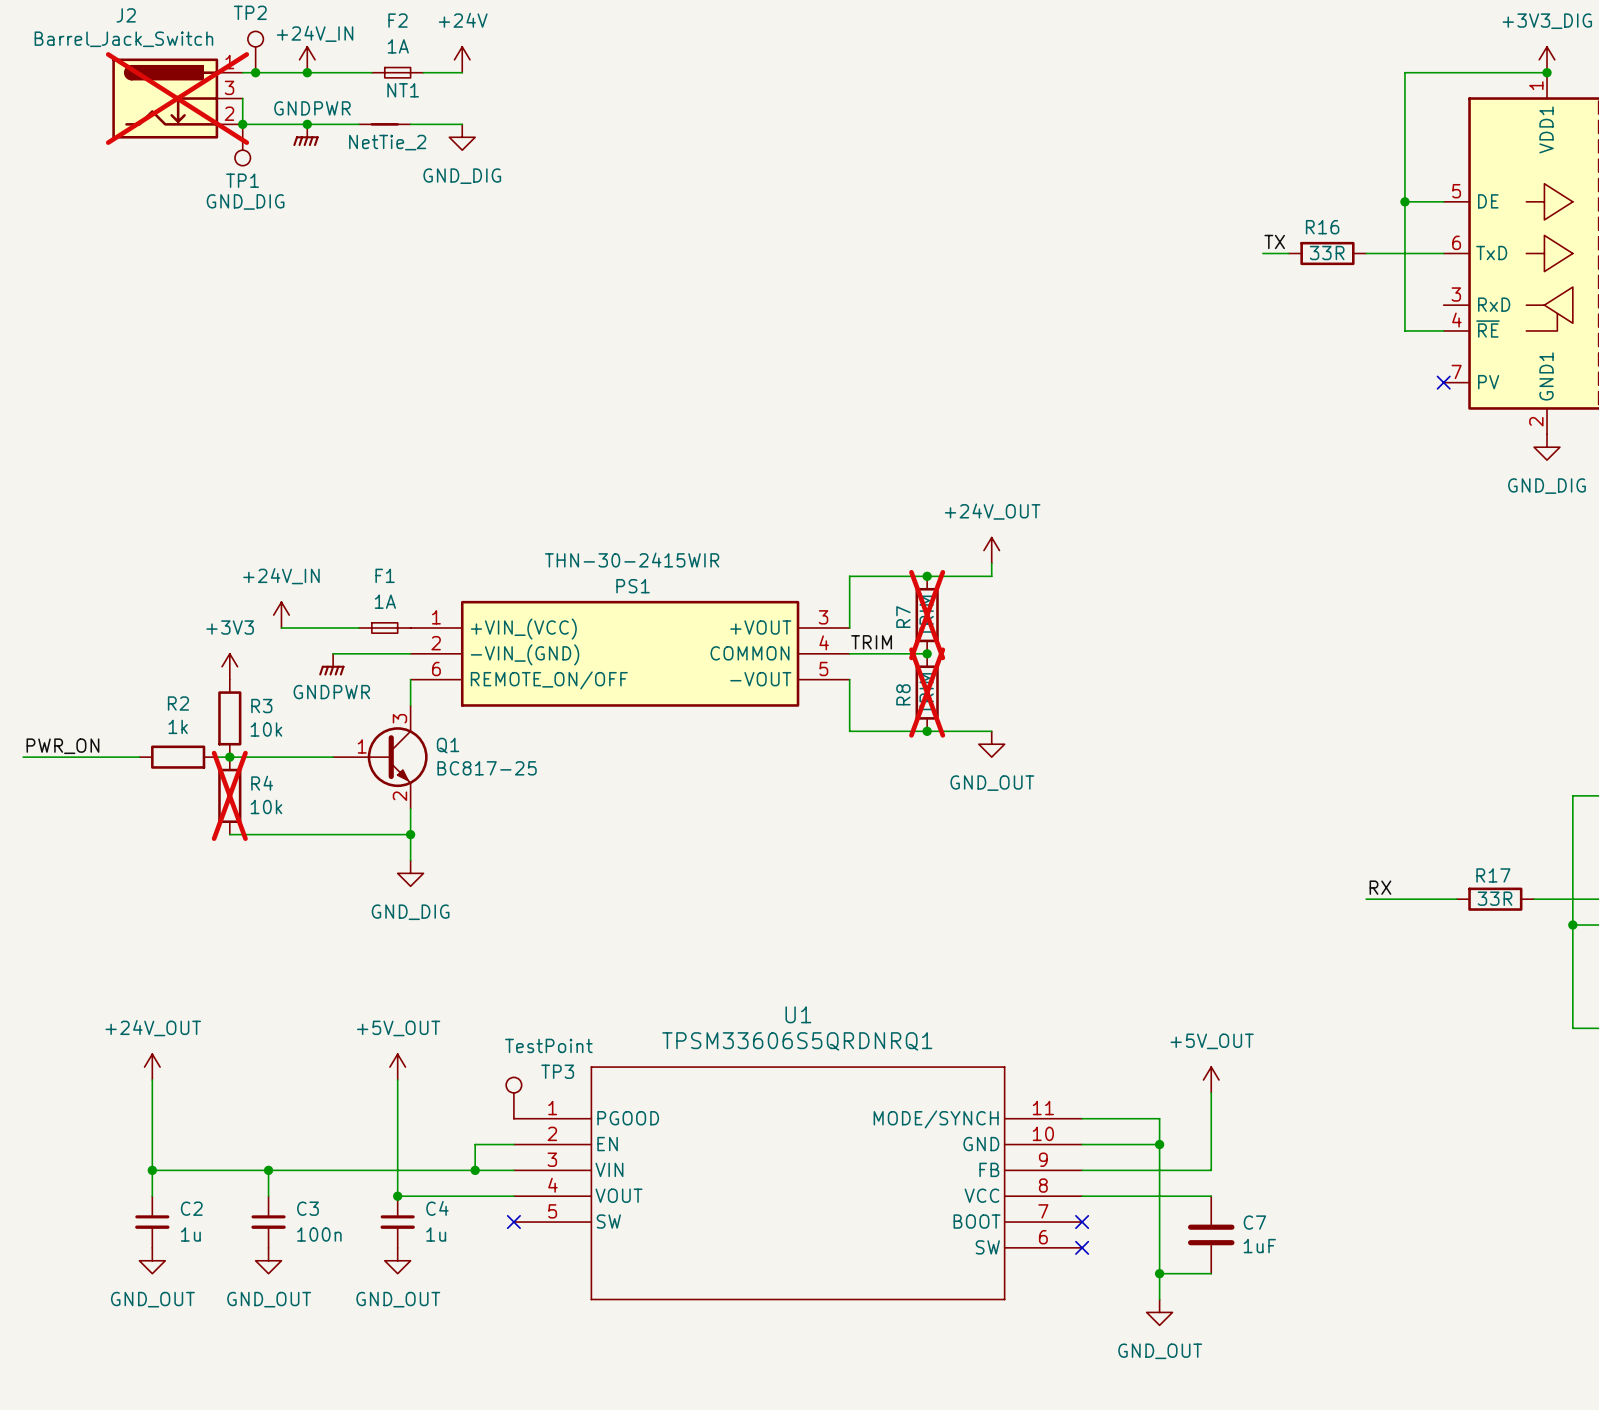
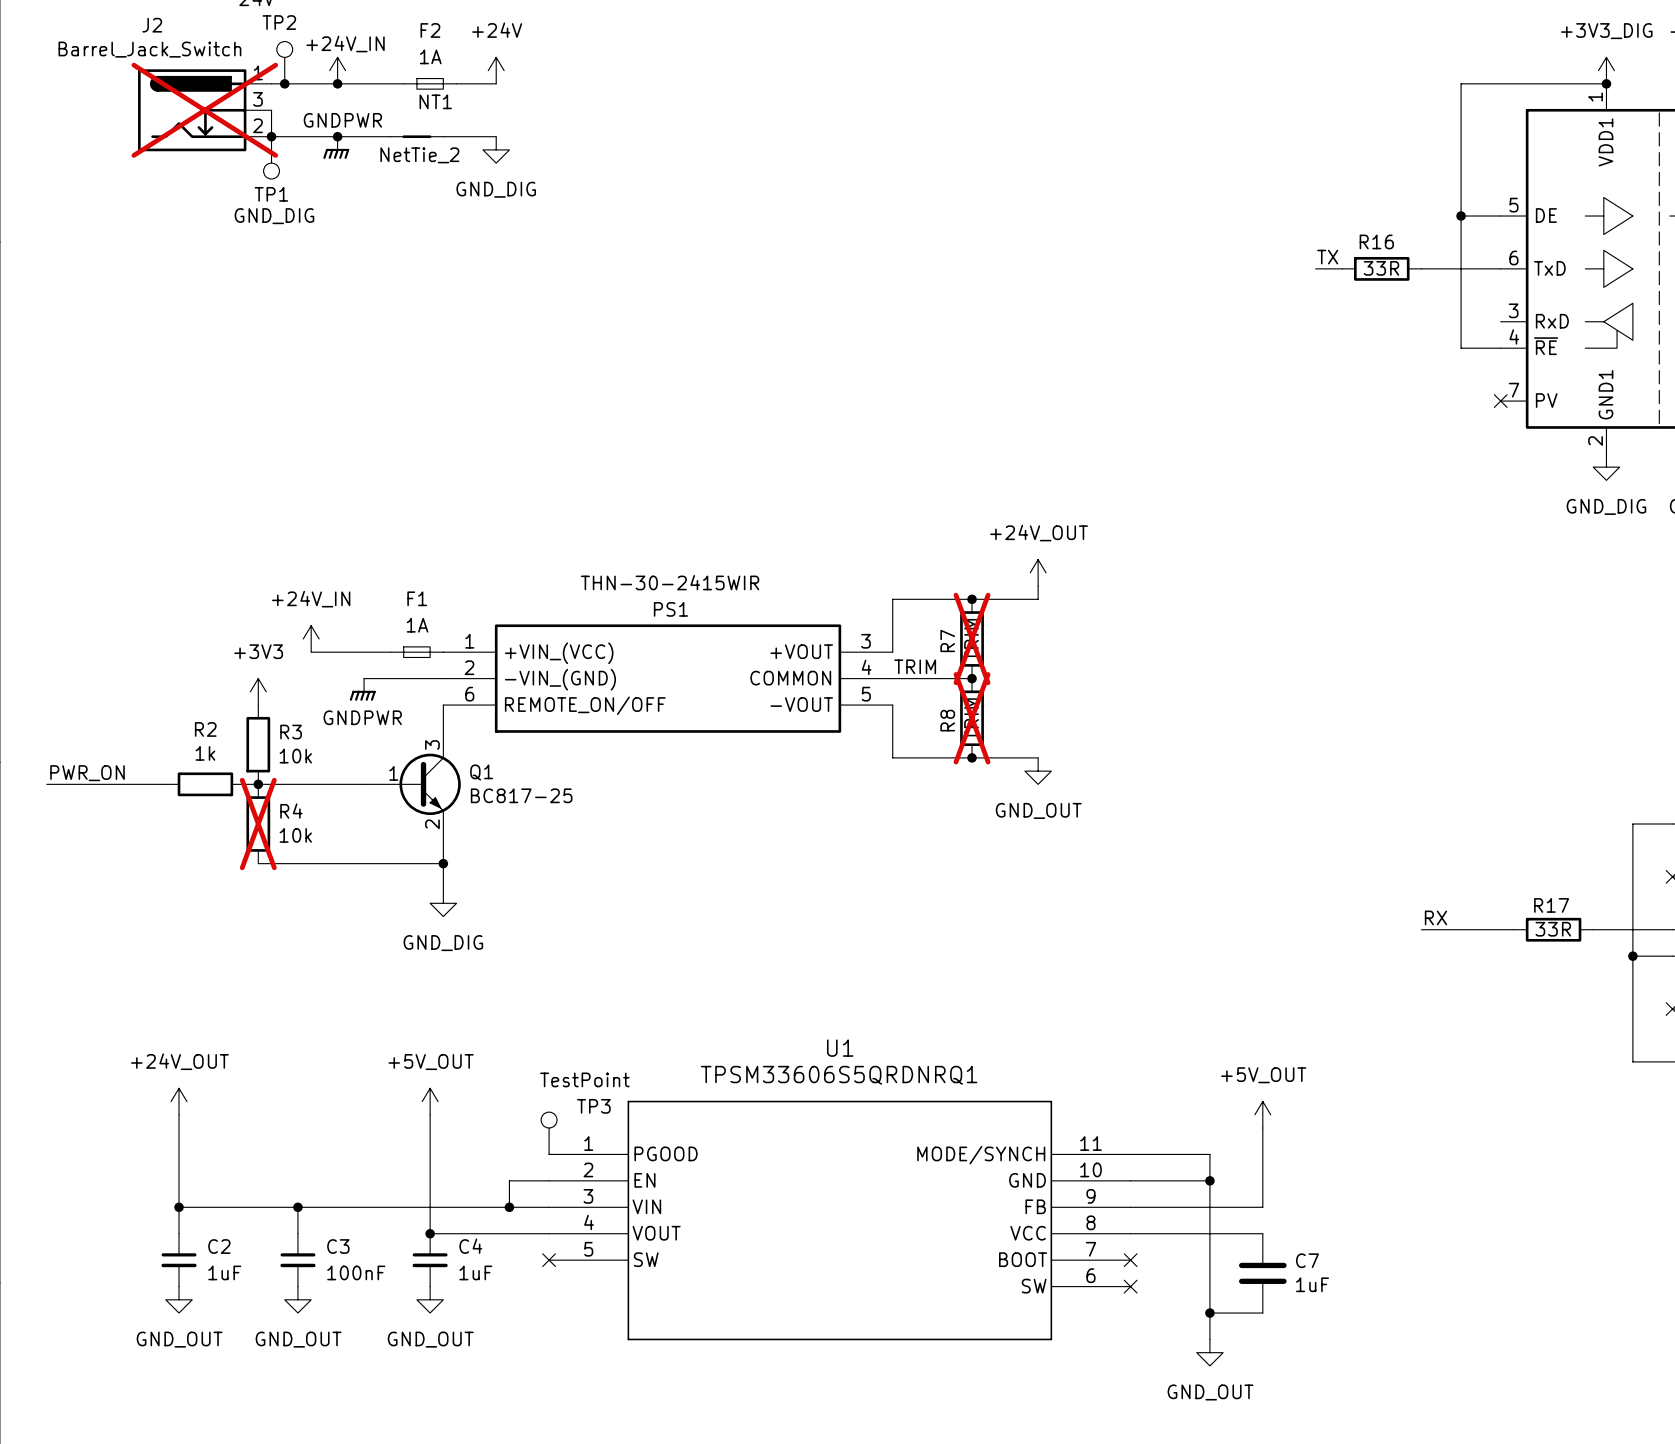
C2 value: 1u (190, 1234) -> 1uF (224, 1272)
C3 value: 100n (319, 1234) -> 100nF (356, 1272)
C4 value: 1u (436, 1234) -> 1uF (475, 1272)

